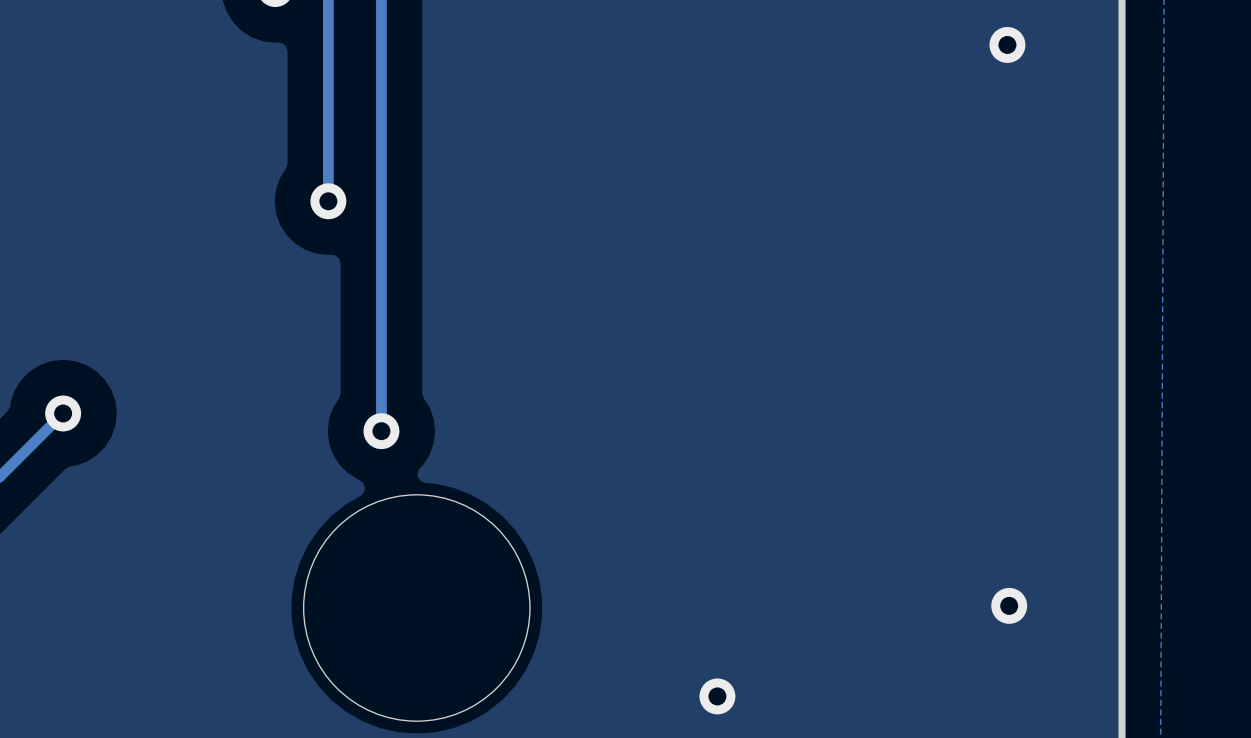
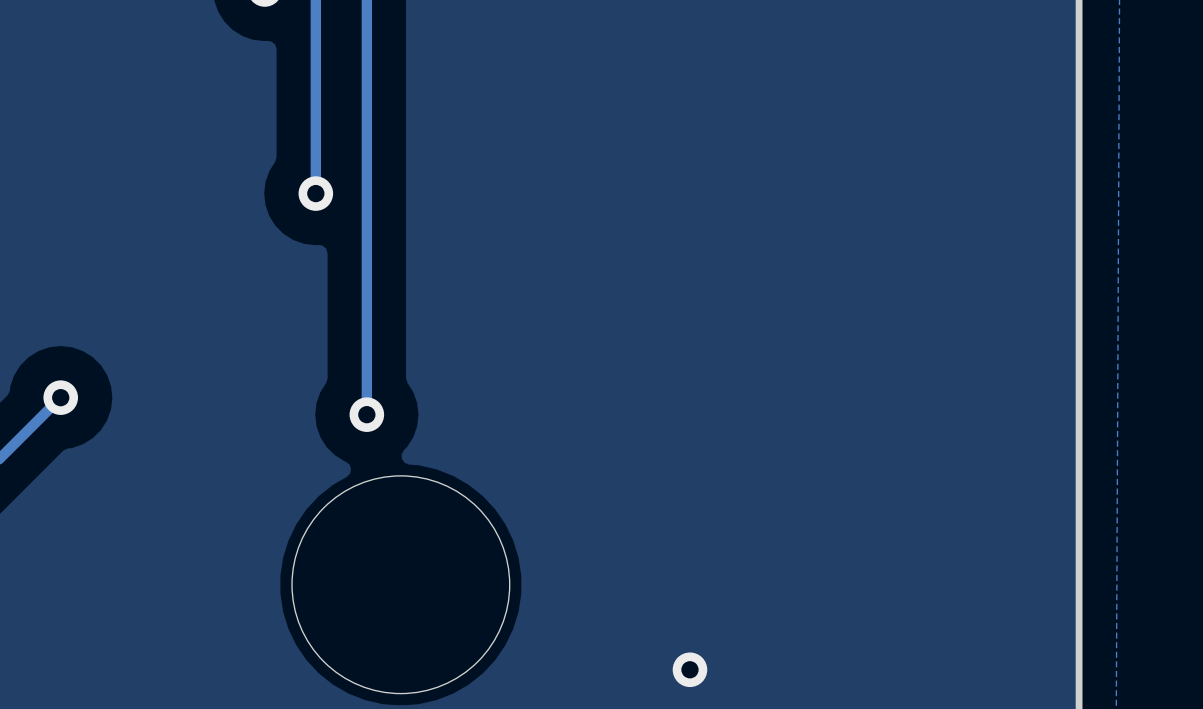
via: (1007, 44) -> none
via: (1009, 605) -> none

